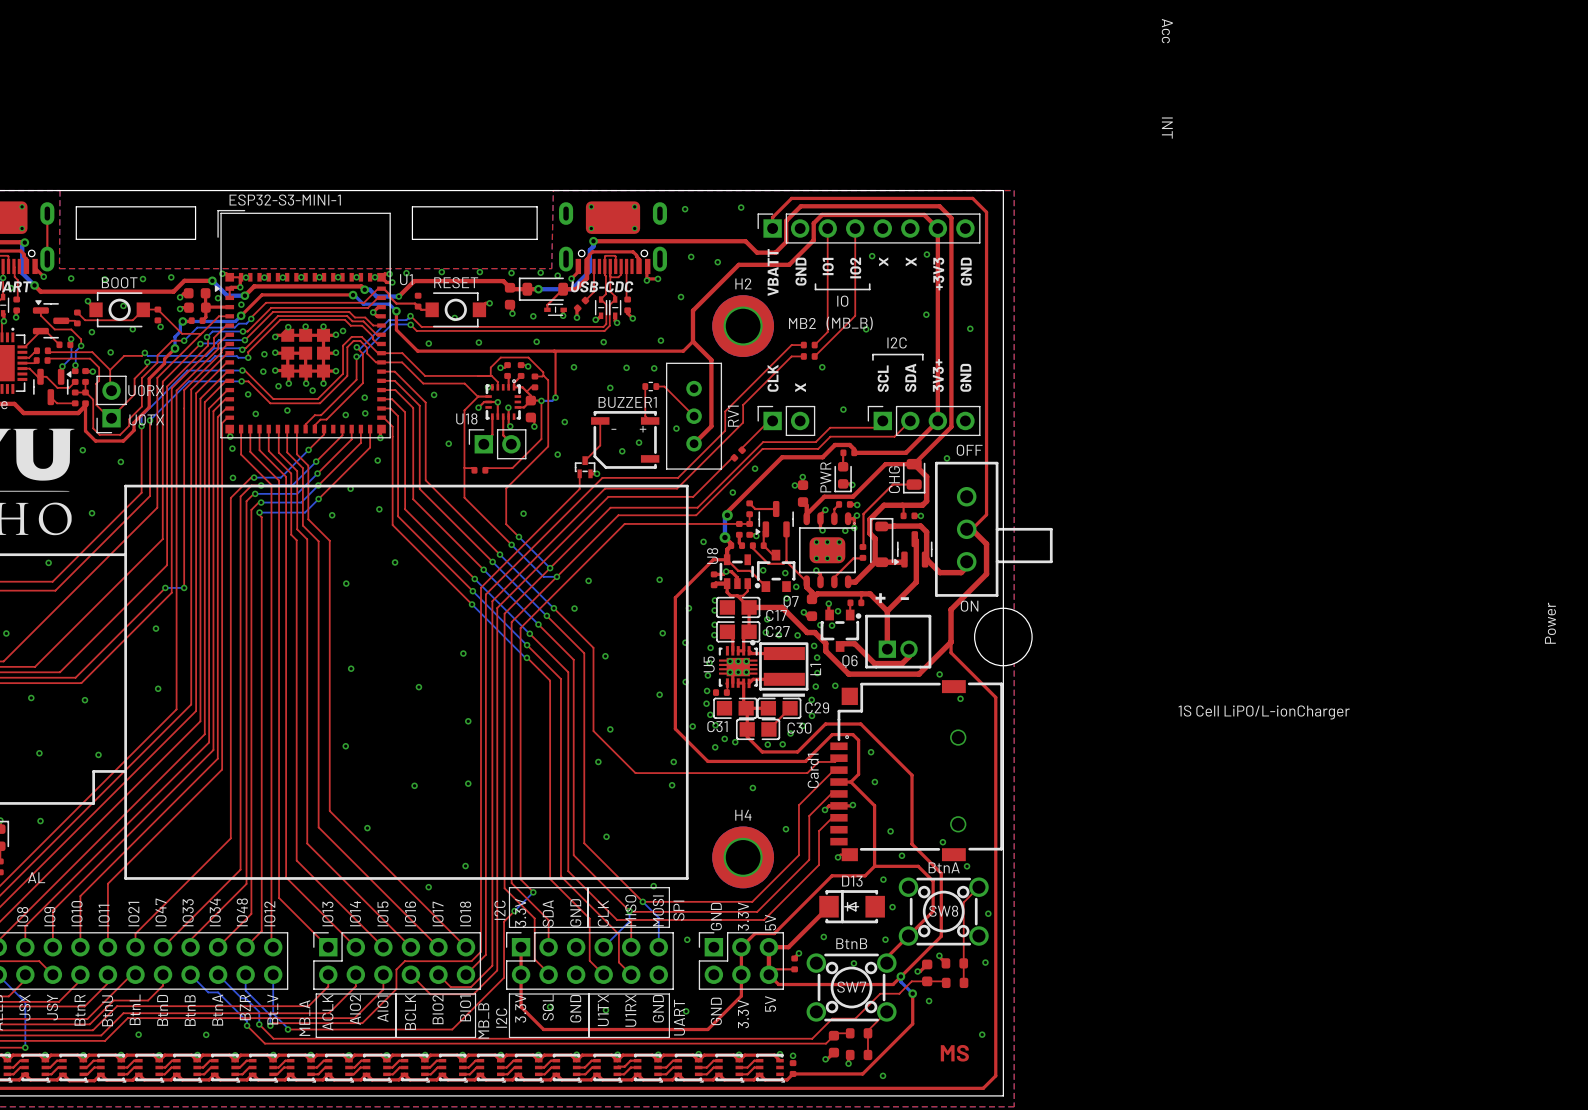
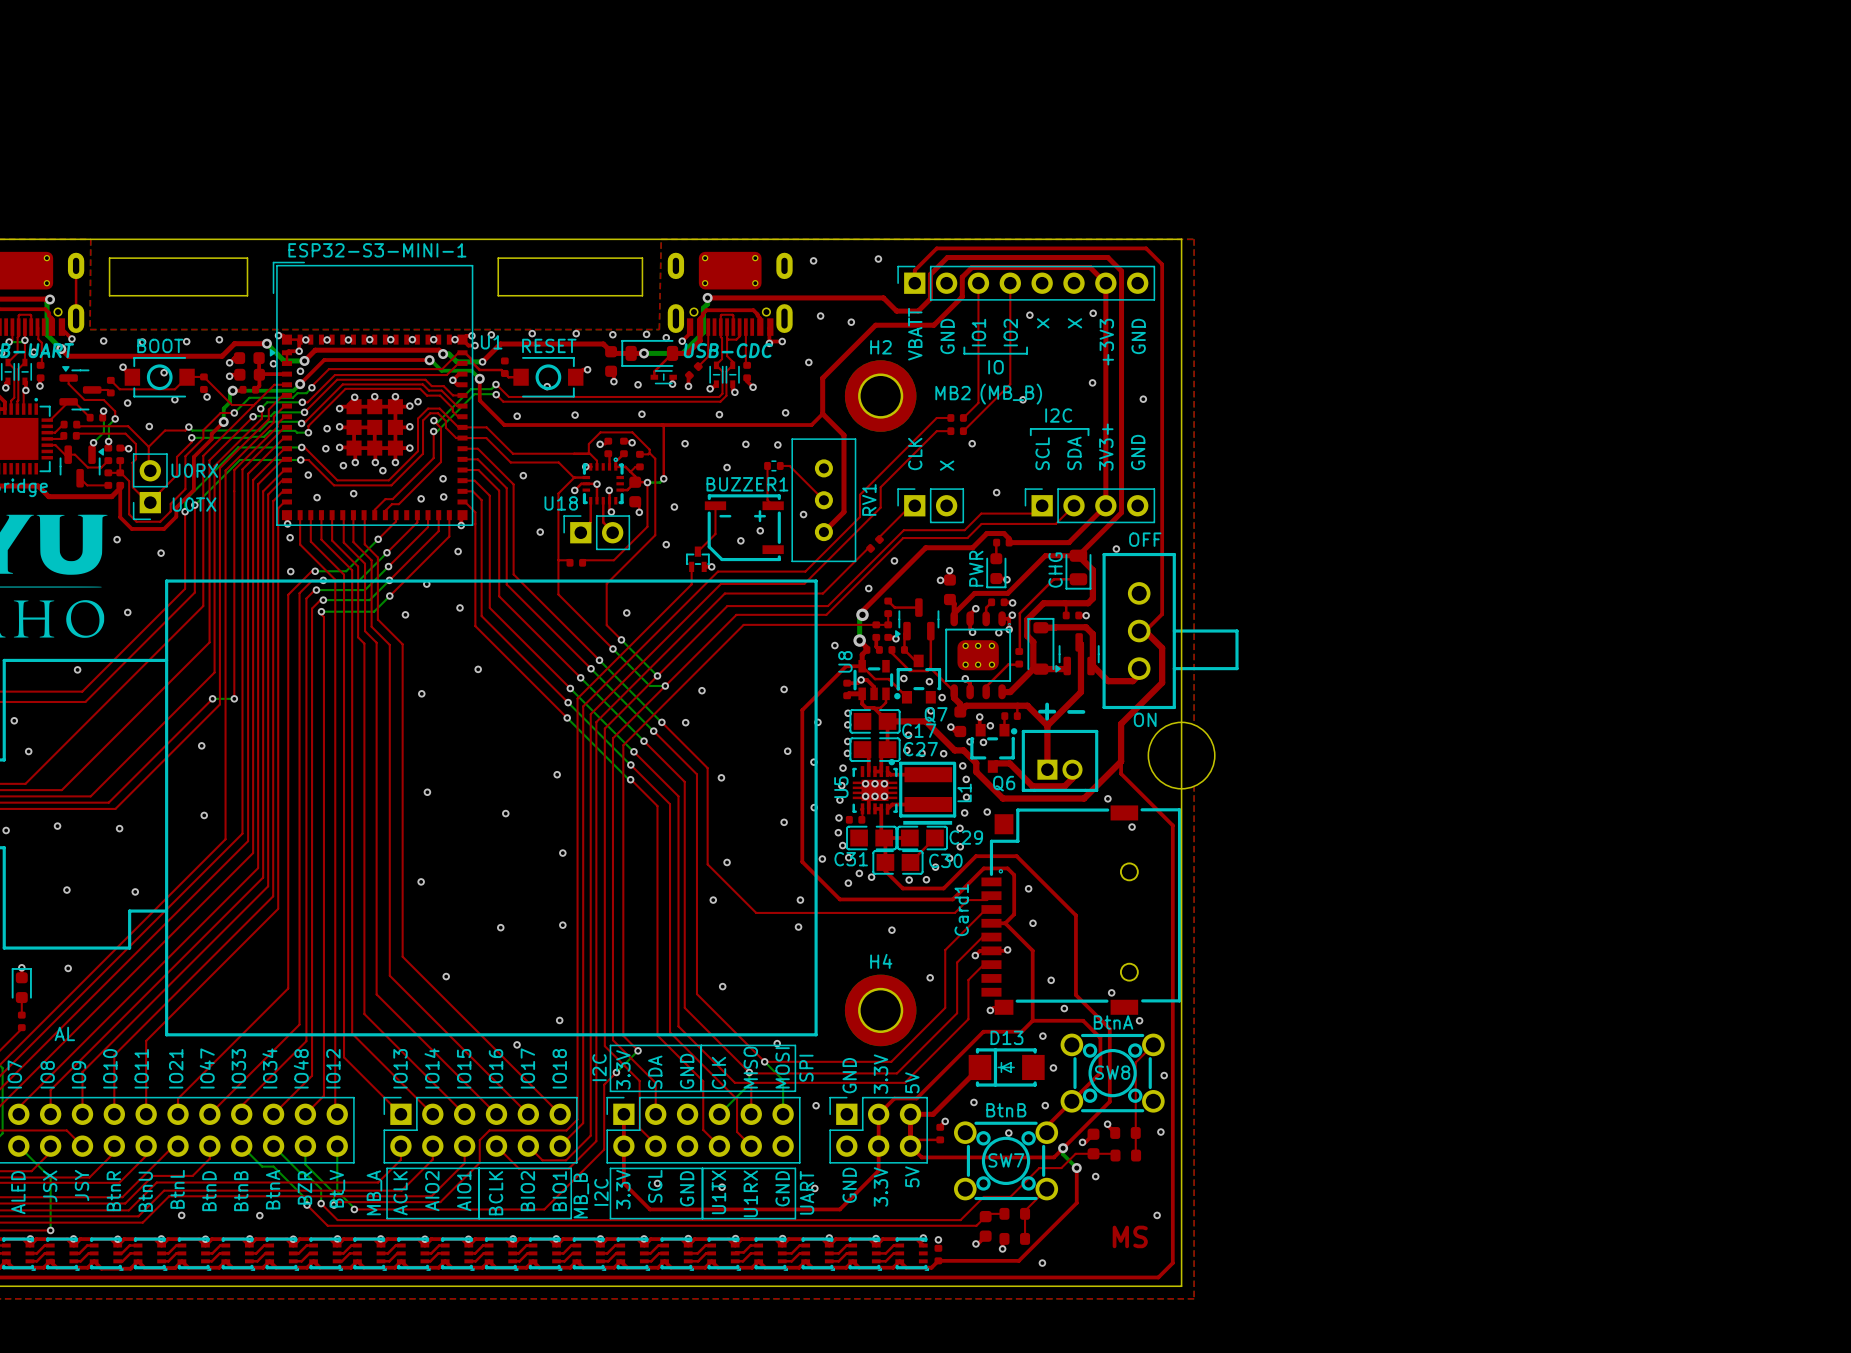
text: Acc (1167, 31) -> none
text: INT (1167, 128) -> none
text: Power (1550, 623) -> none
text: 1S Cell LiPO/L-ionCharger (1264, 712) -> none

